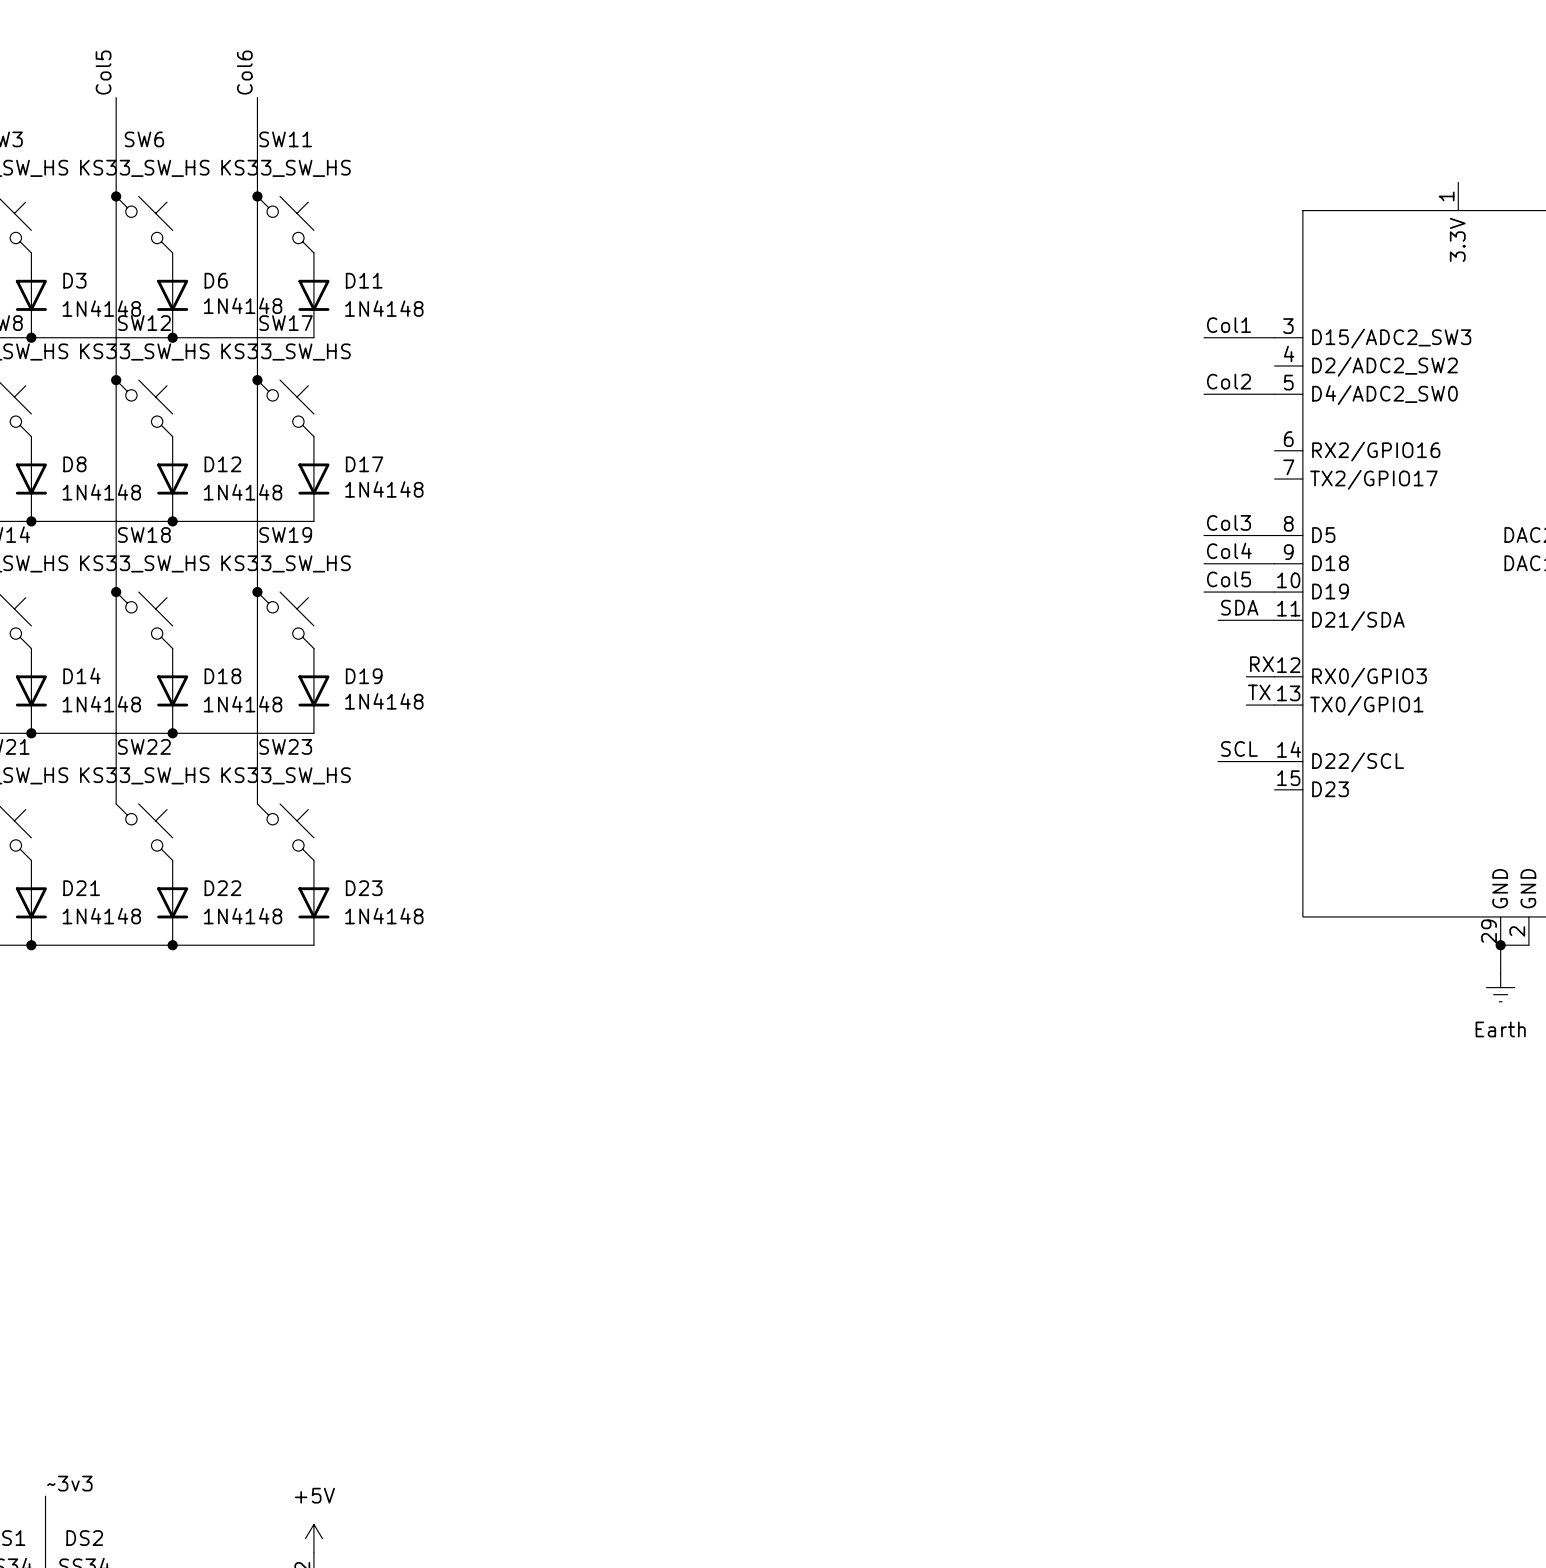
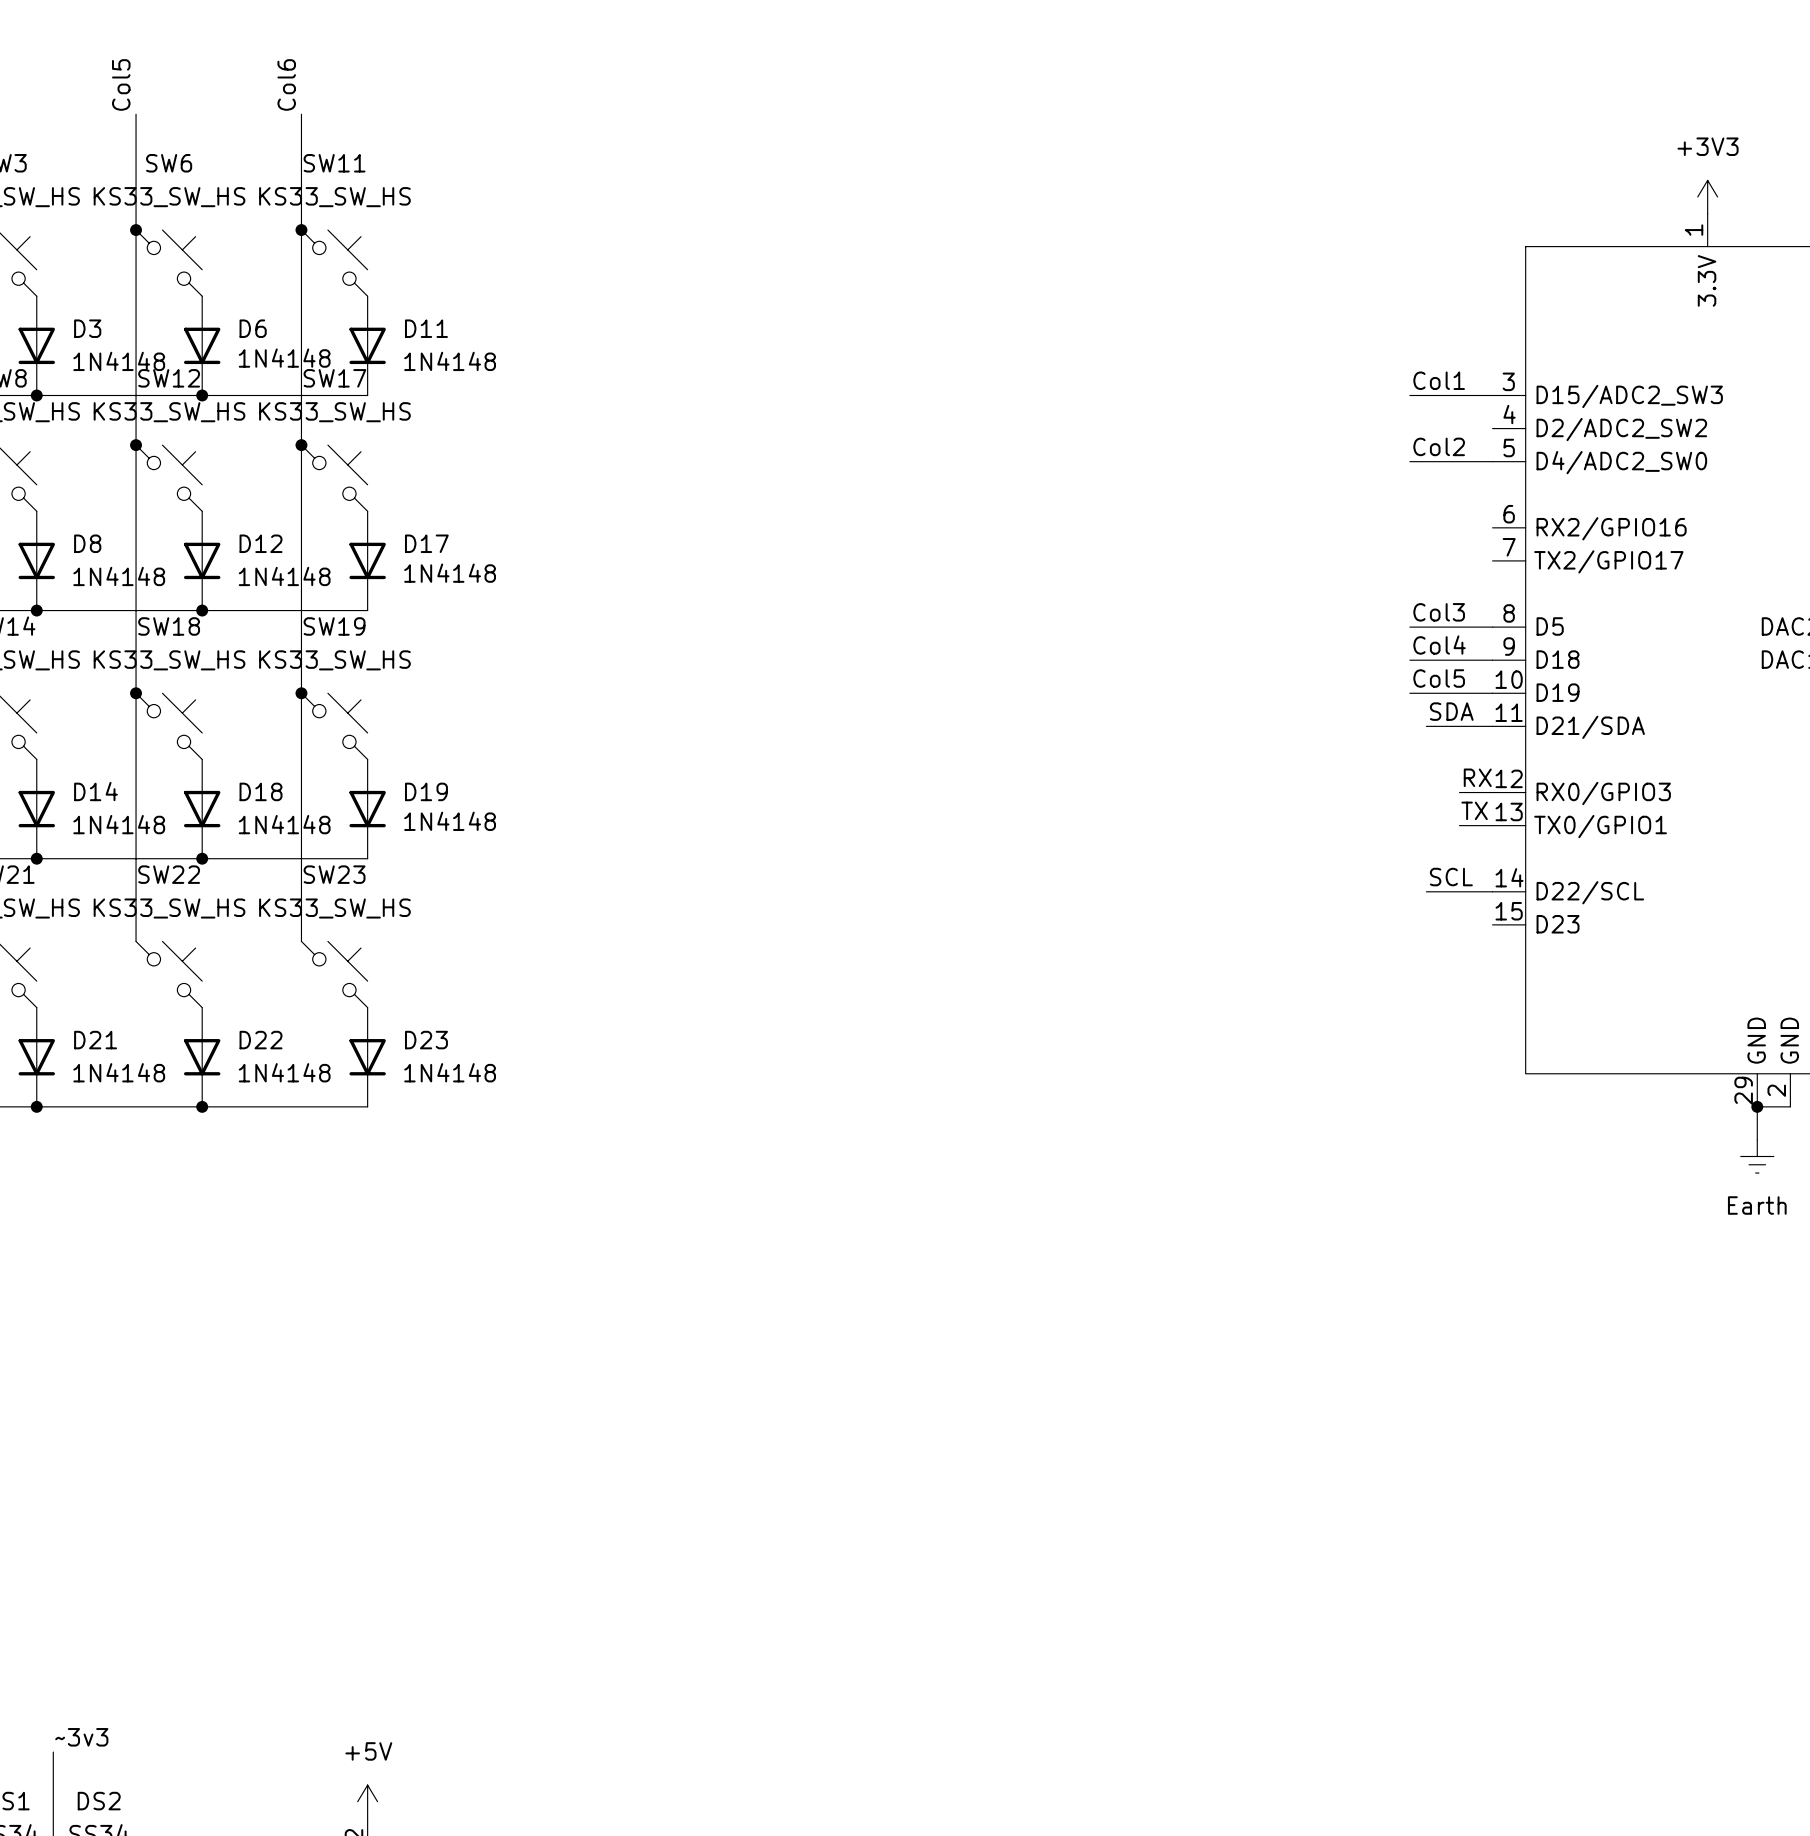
power symbol: none -> +3V3 (1707, 196)

